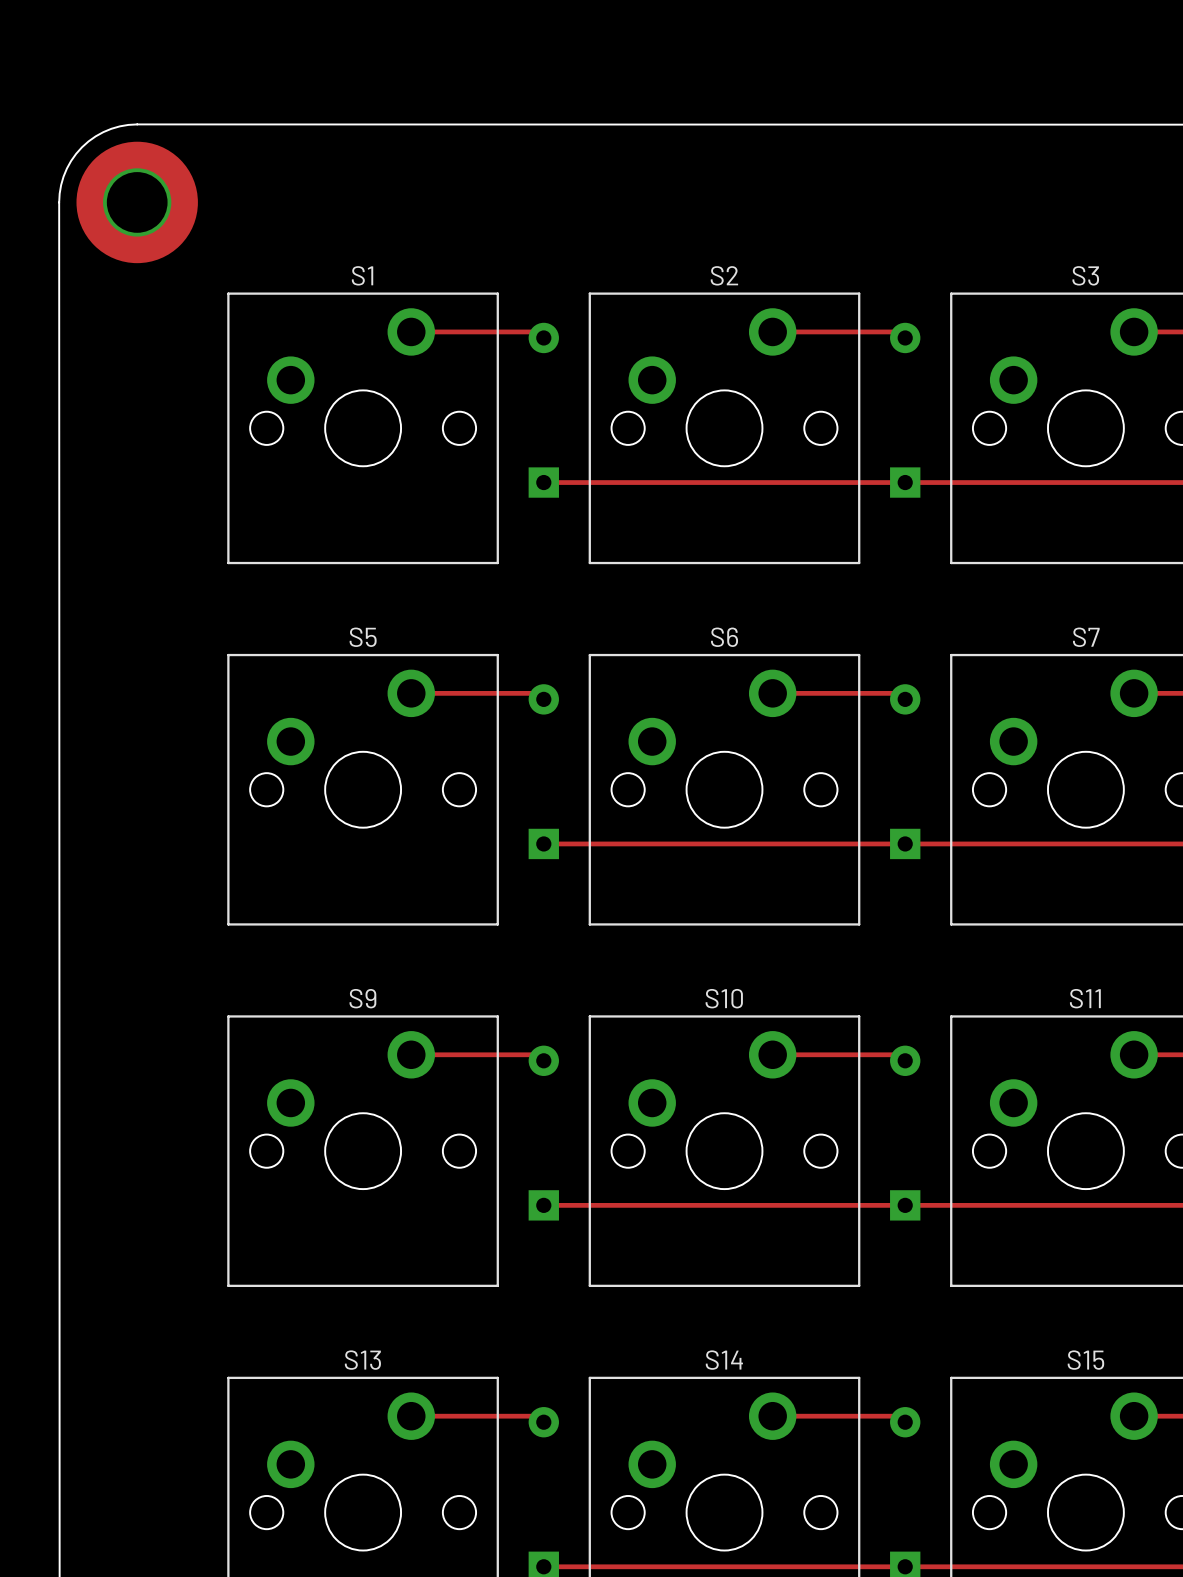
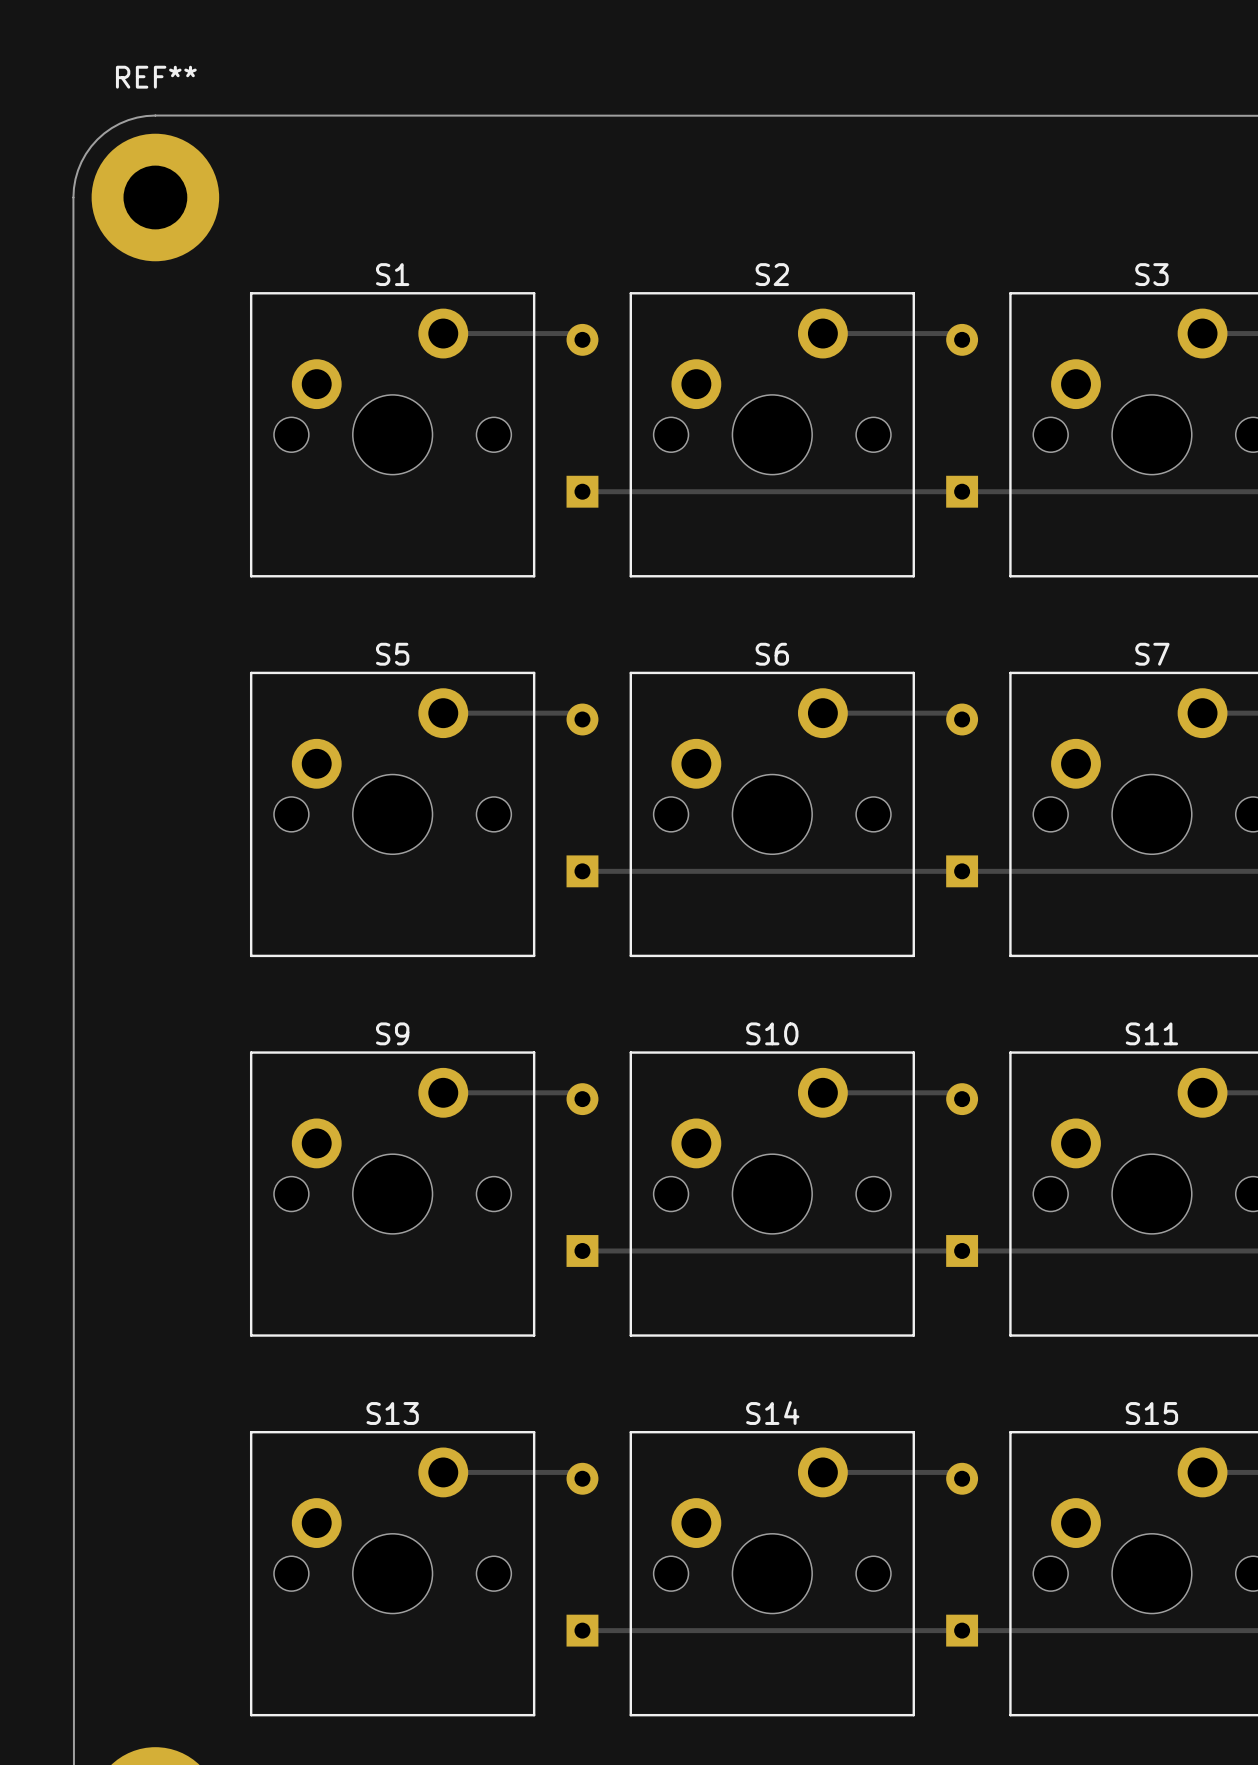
REF** name: none -> REF** (156, 77)

